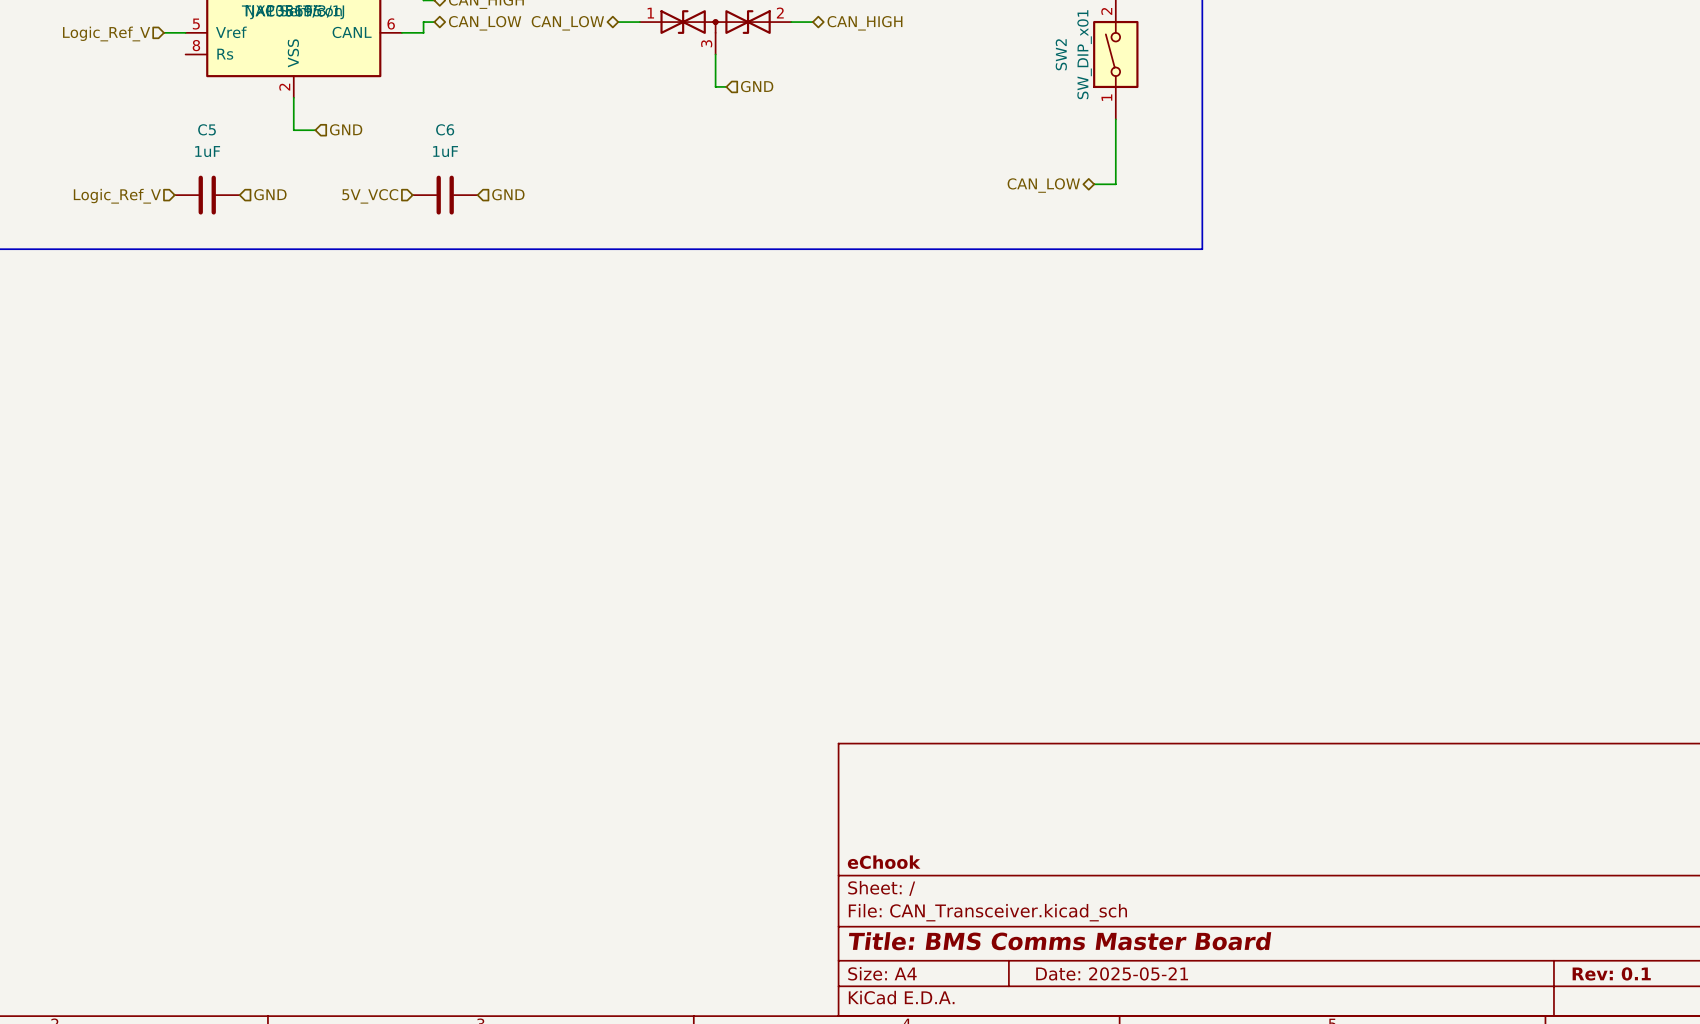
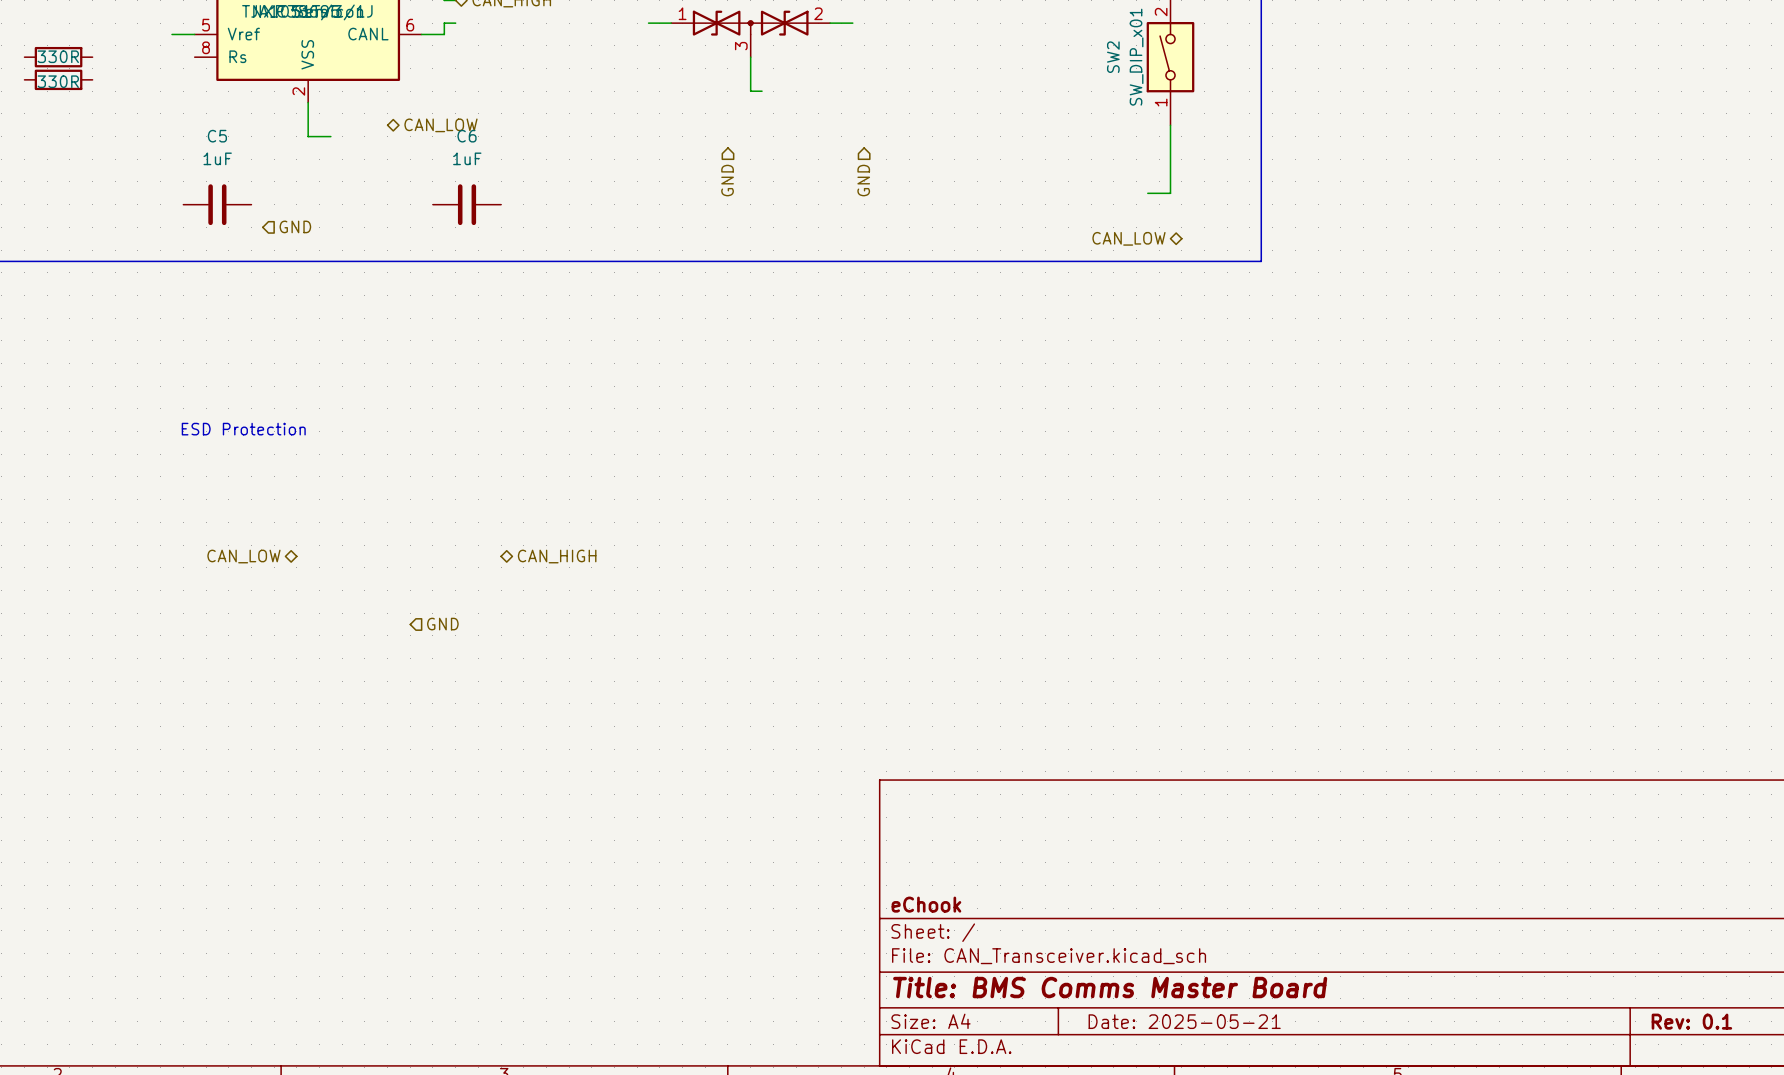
hierarchical label position: CAN_LOW (485, 23) -> CAN_LOW (440, 125)
hierarchical label: CAN_LOW (567, 23) -> none
hierarchical label: CAN_HIGH (864, 23) -> none
hierarchical label: Logic_Ref_V (106, 33) -> none
part: none -> 330R (58, 57)
part: none -> 330R (58, 79)
hierarchical label: GND (757, 86) -> none
hierarchical label: GND (346, 129) -> none
hierarchical label: none -> GND (727, 180)
hierarchical label: none -> GND (863, 180)
hierarchical label position: CAN_LOW (1043, 185) -> CAN_LOW (1128, 238)
hierarchical label position: GND (270, 194) -> GND (295, 226)
hierarchical label: GND (508, 194) -> none
hierarchical label: Logic_Ref_V (117, 196) -> none
hierarchical label: 5V_VCC (370, 196) -> none
text: none -> ESD Protection (243, 429)
hierarchical label: none -> CAN_LOW (243, 556)
hierarchical label: none -> CAN_HIGH (557, 556)
hierarchical label: none -> GND (442, 624)

